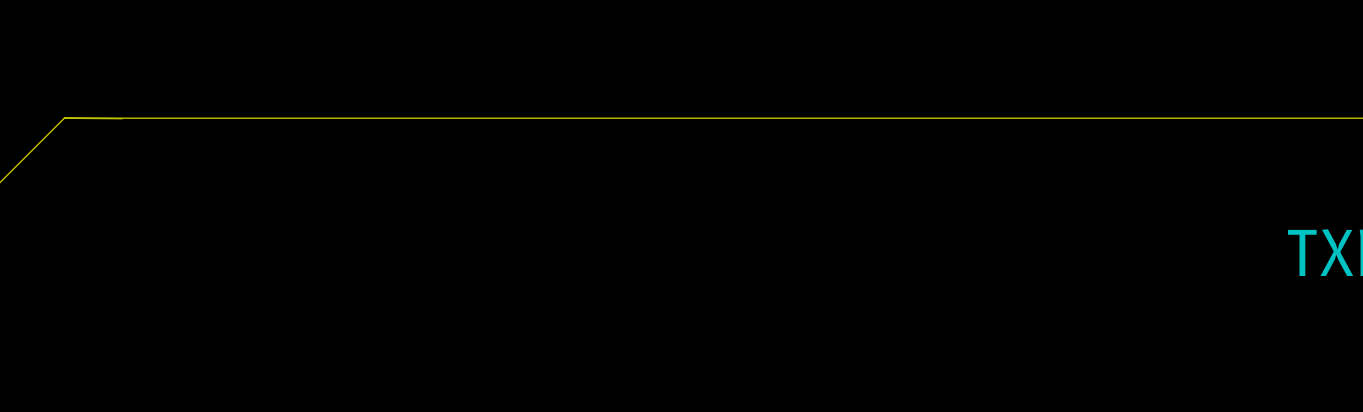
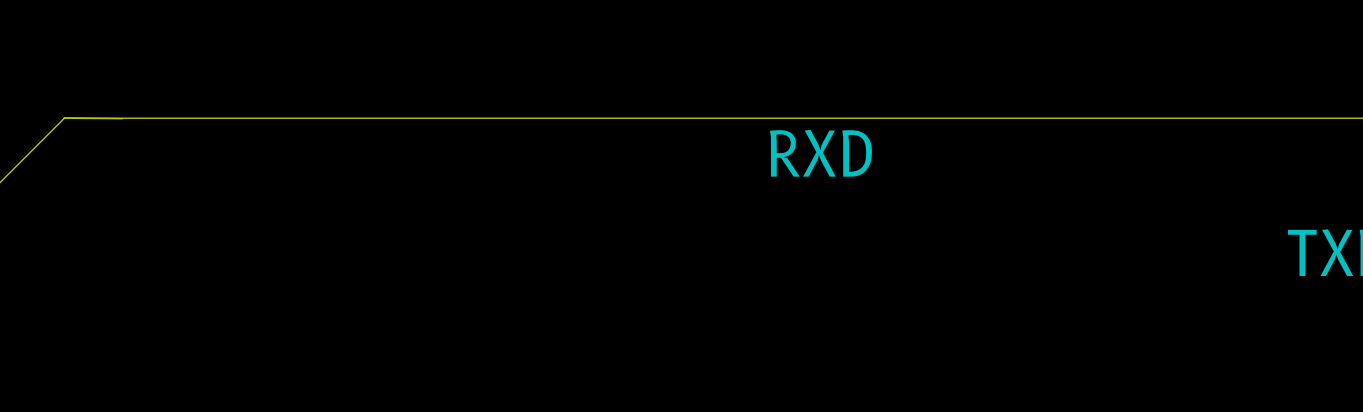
text: none -> RXD (820, 153)

